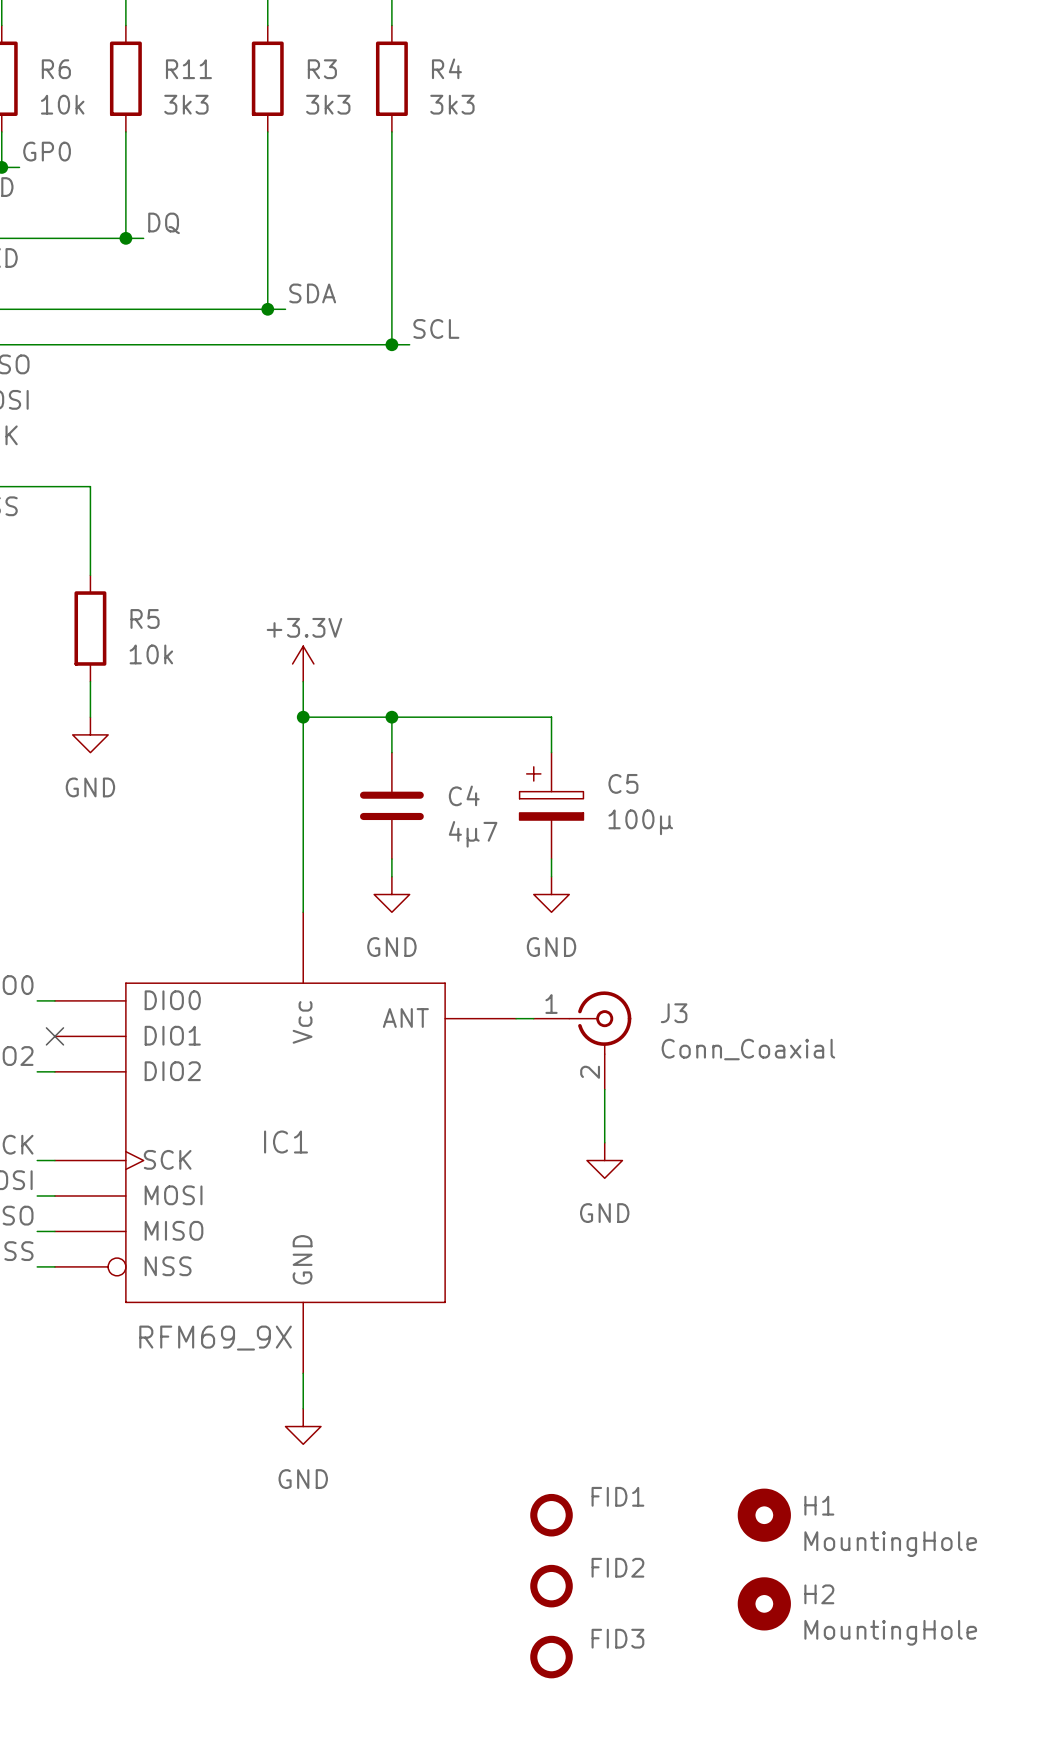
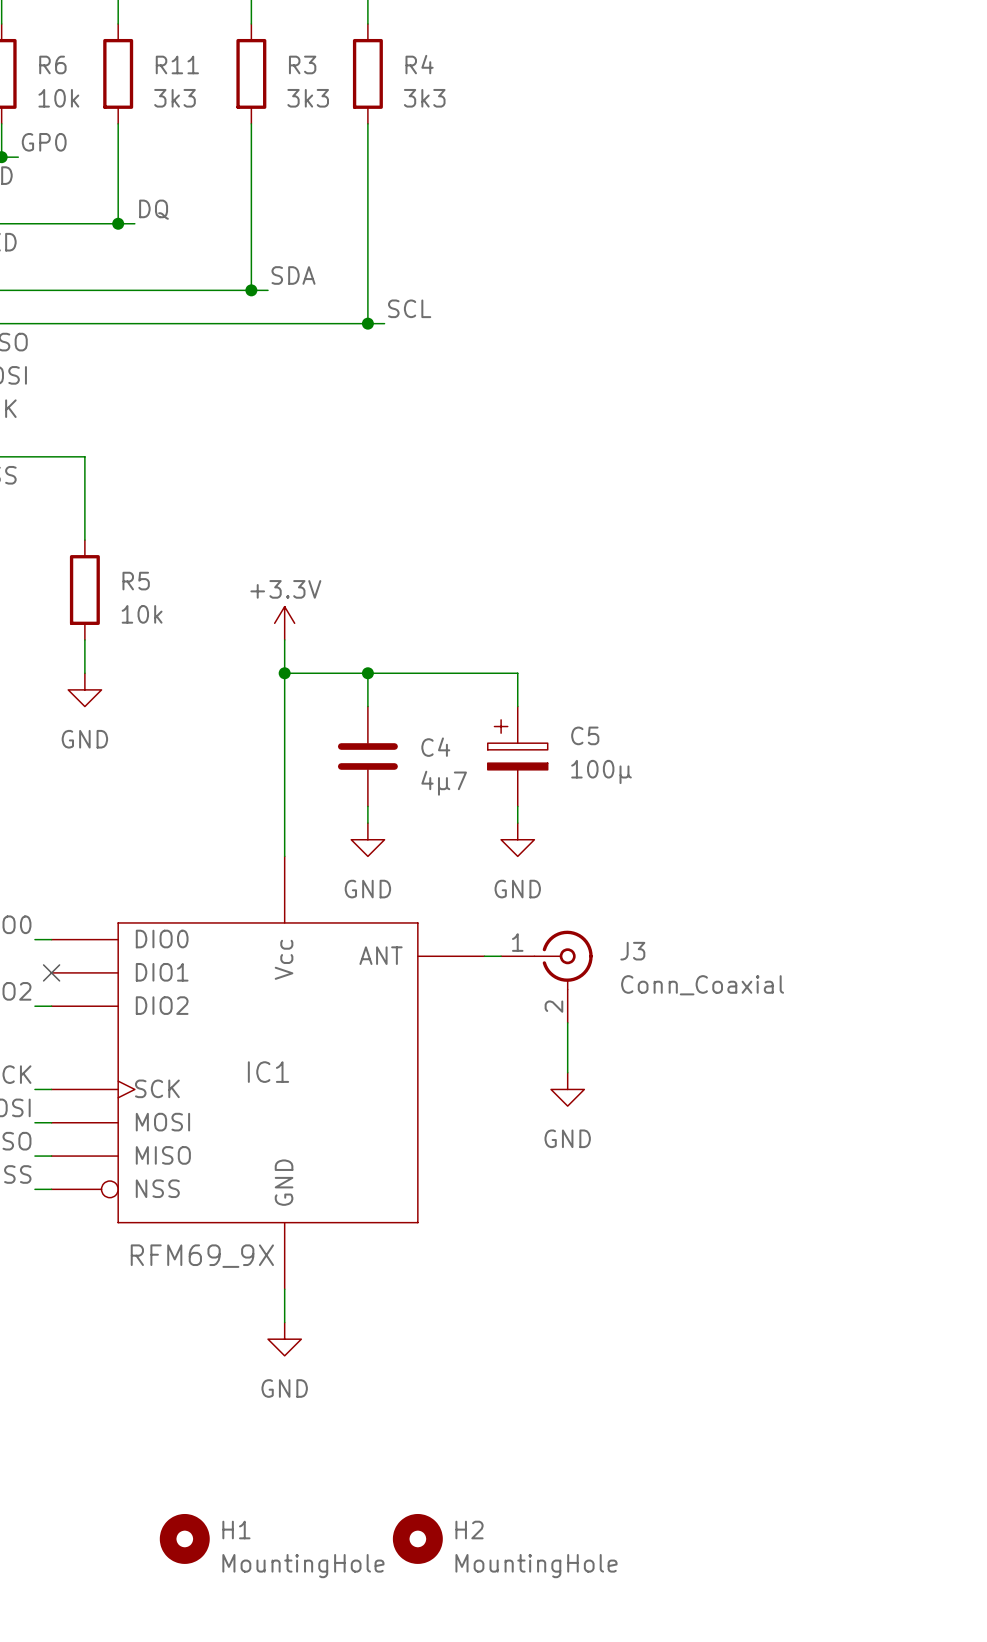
FID1: (551, 1515) -> none
H1 position: (764, 1515) -> (184, 1538)
FID2: (551, 1586) -> none
H2 position: (764, 1603) -> (417, 1538)
FID3: (551, 1657) -> none

